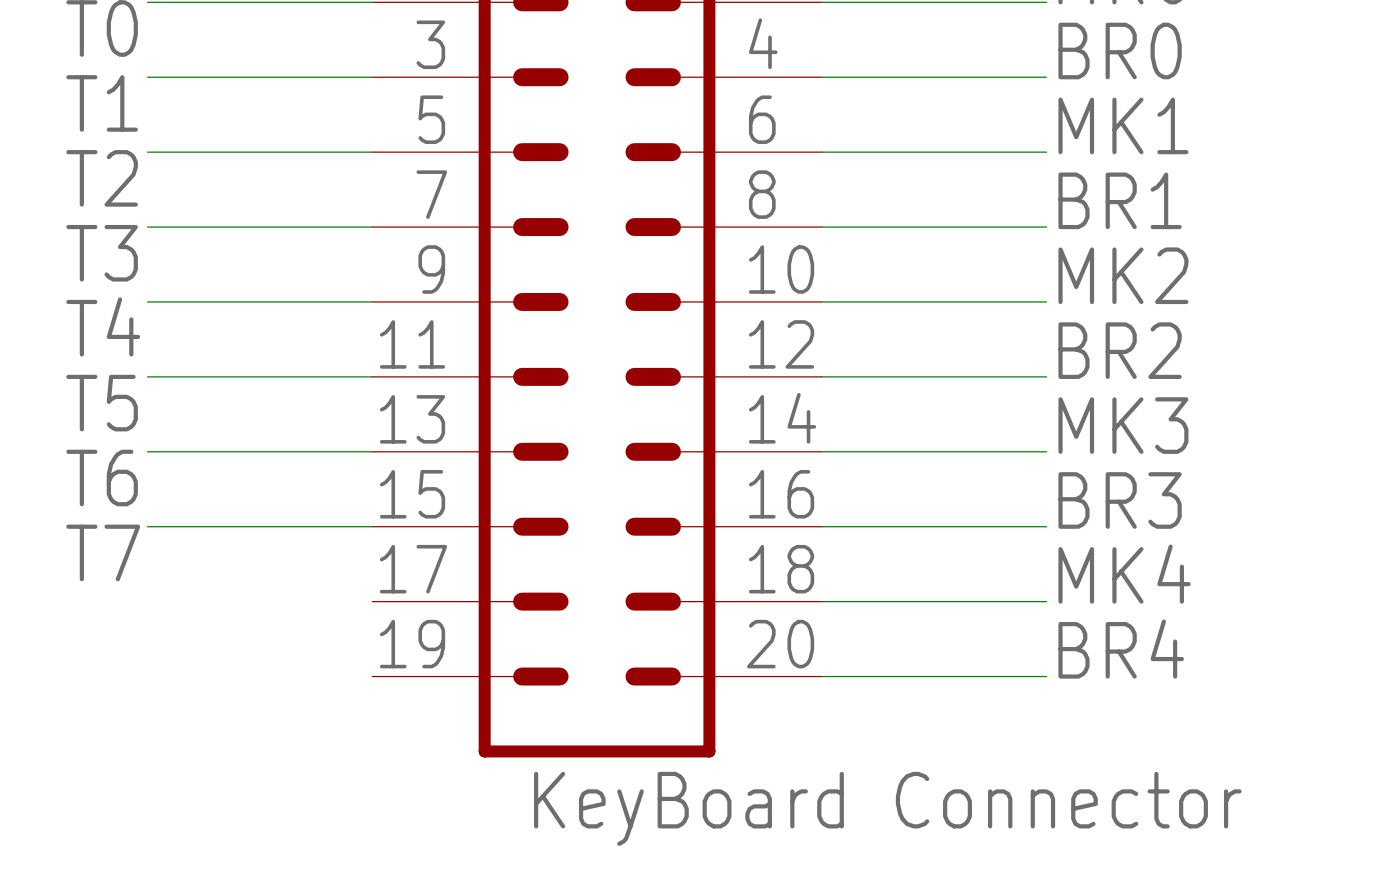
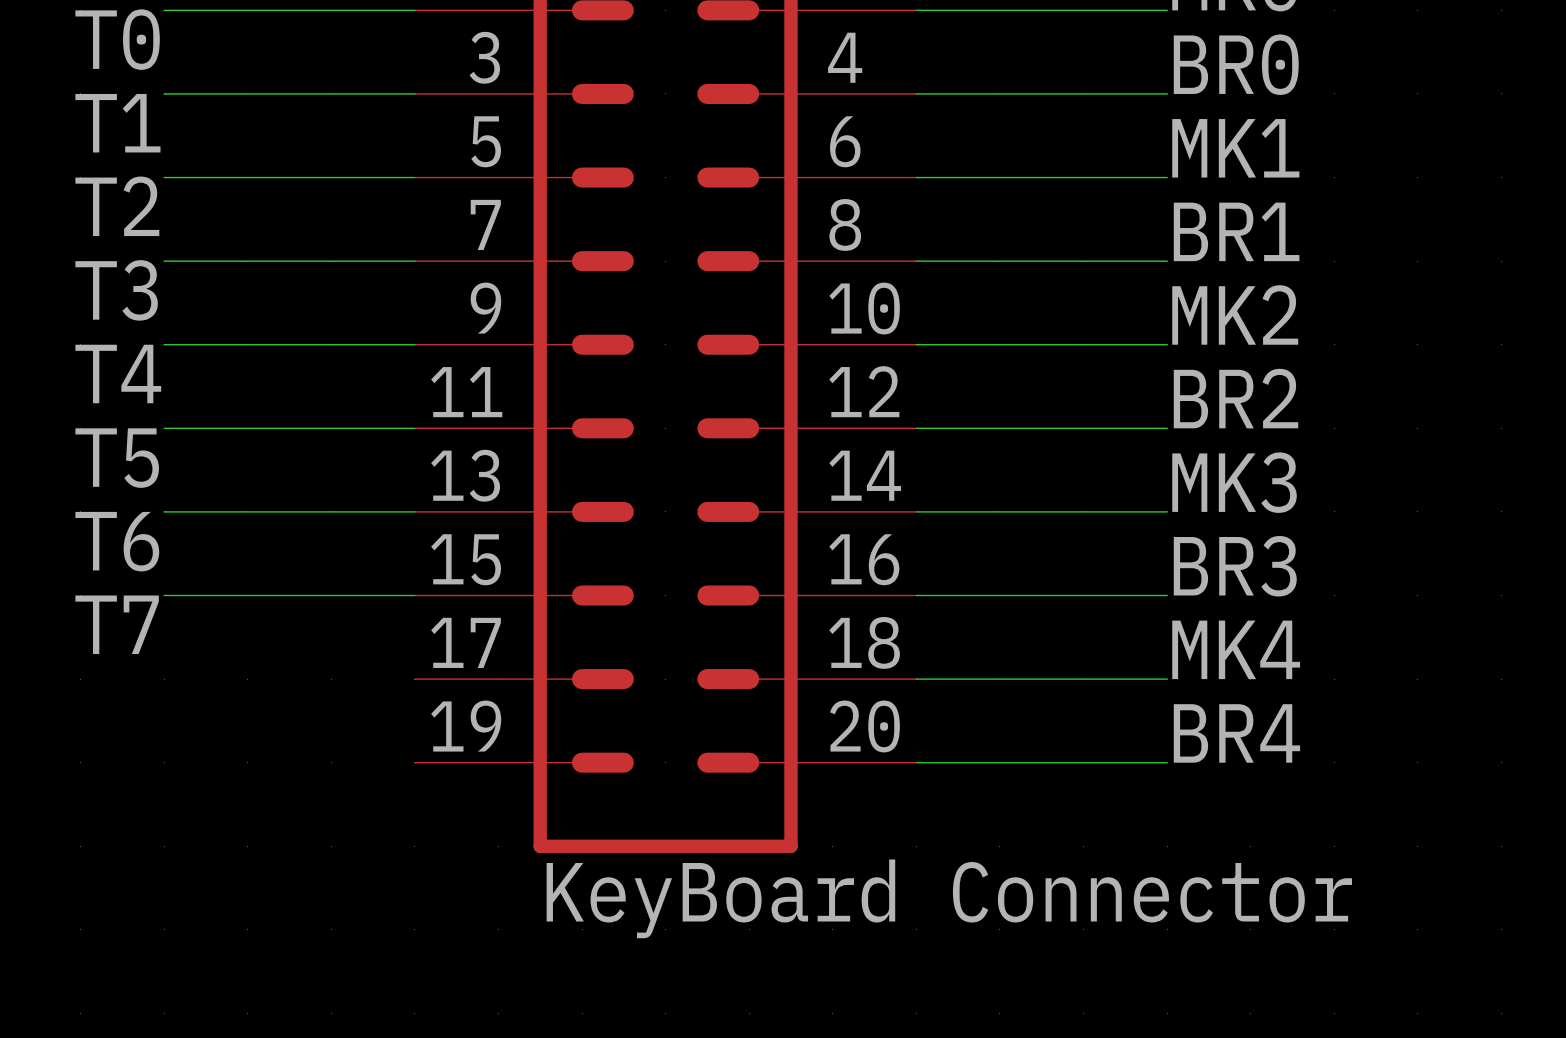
part value position: KeyBoard Connector (887, 808) -> KeyBoard Connector (949, 898)

